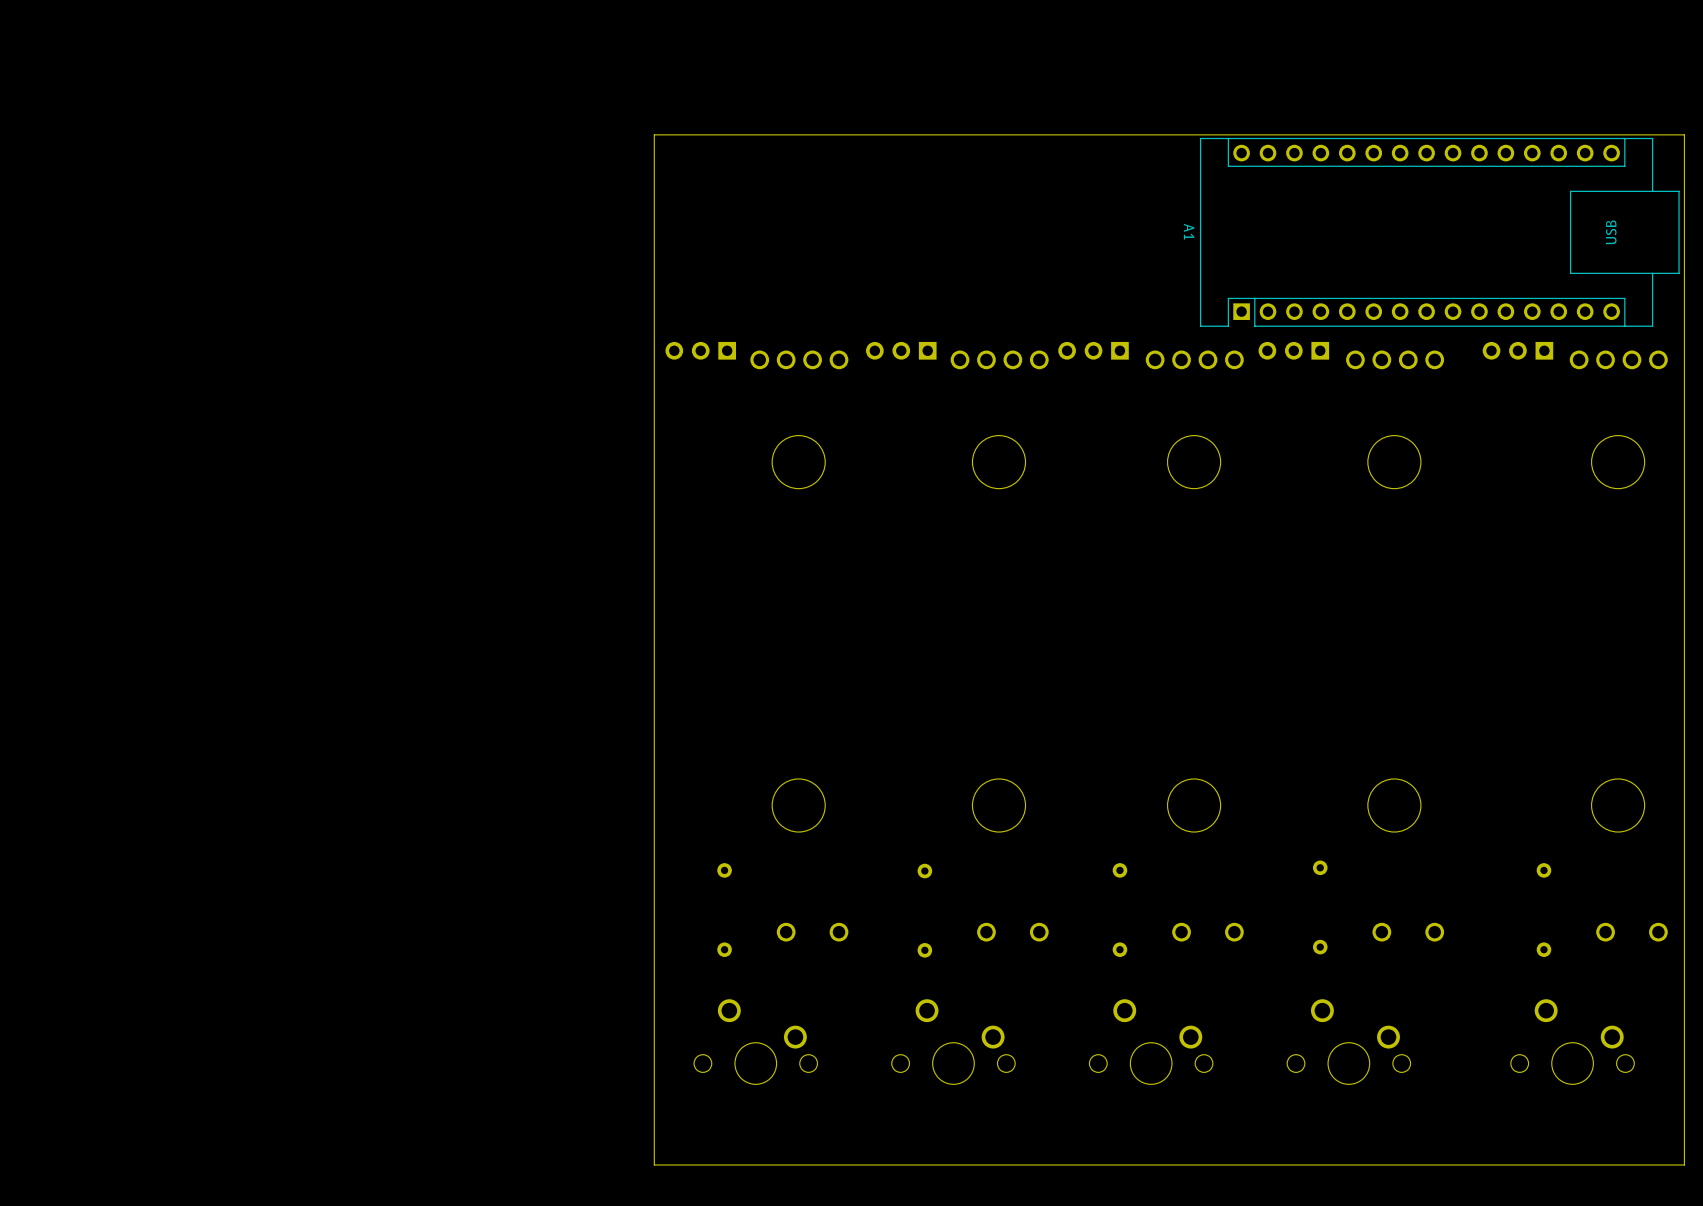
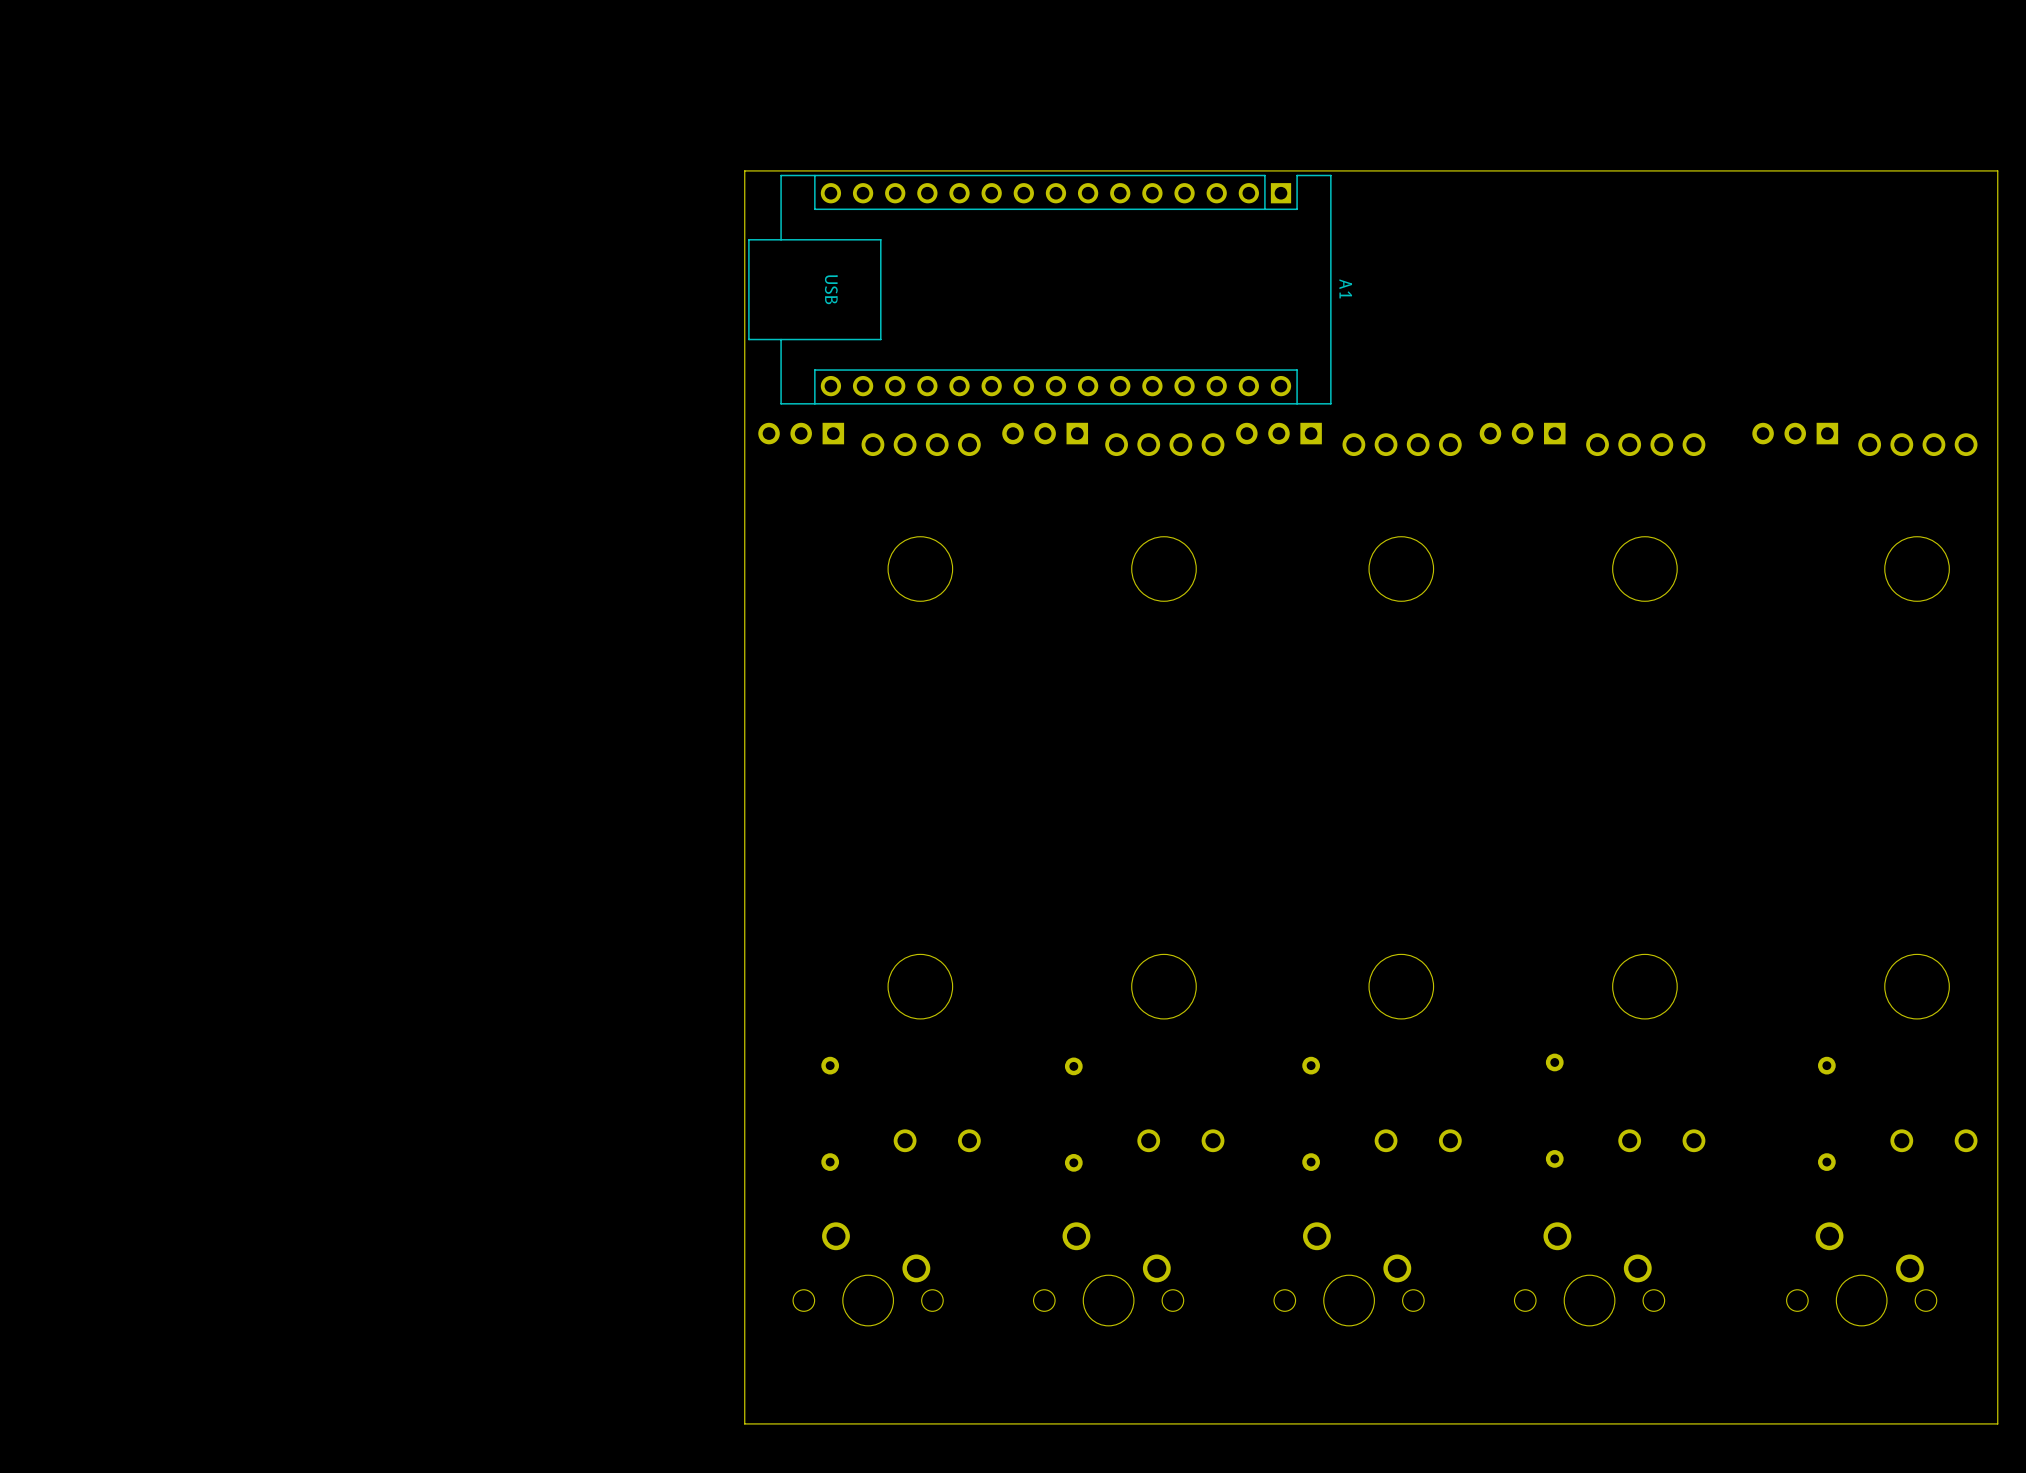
A1 rotation: 0° (1439, 232) -> 180° (1039, 289)
A1 position: (1439, 232) -> (1039, 289)

